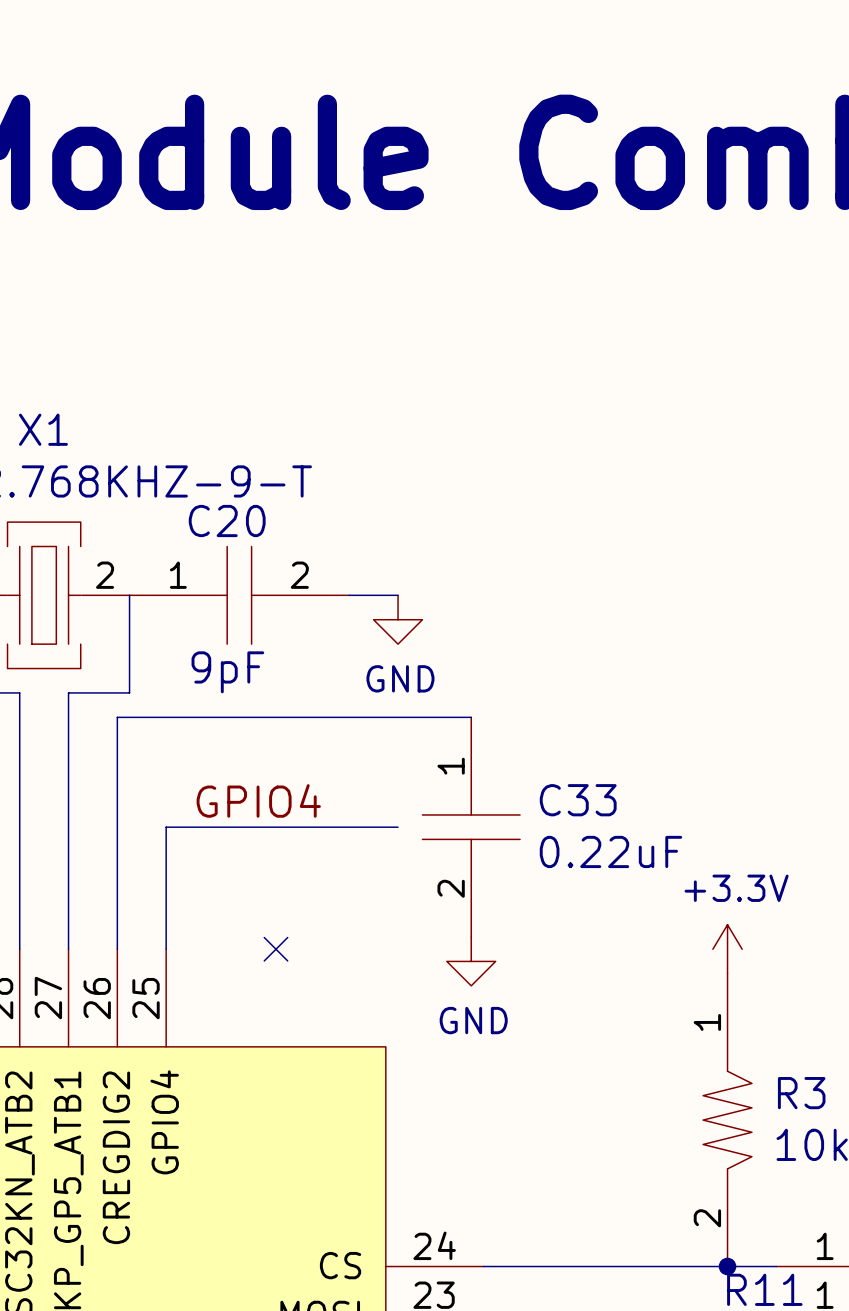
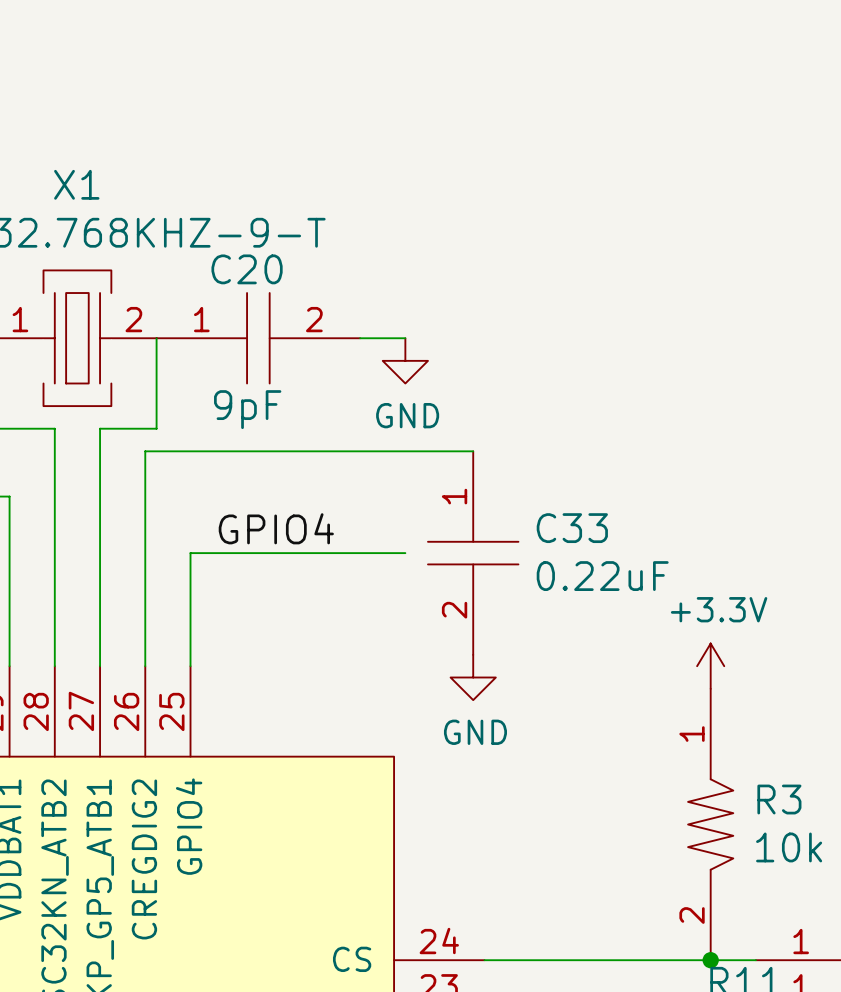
no-connect mark: (275, 949) -> none

